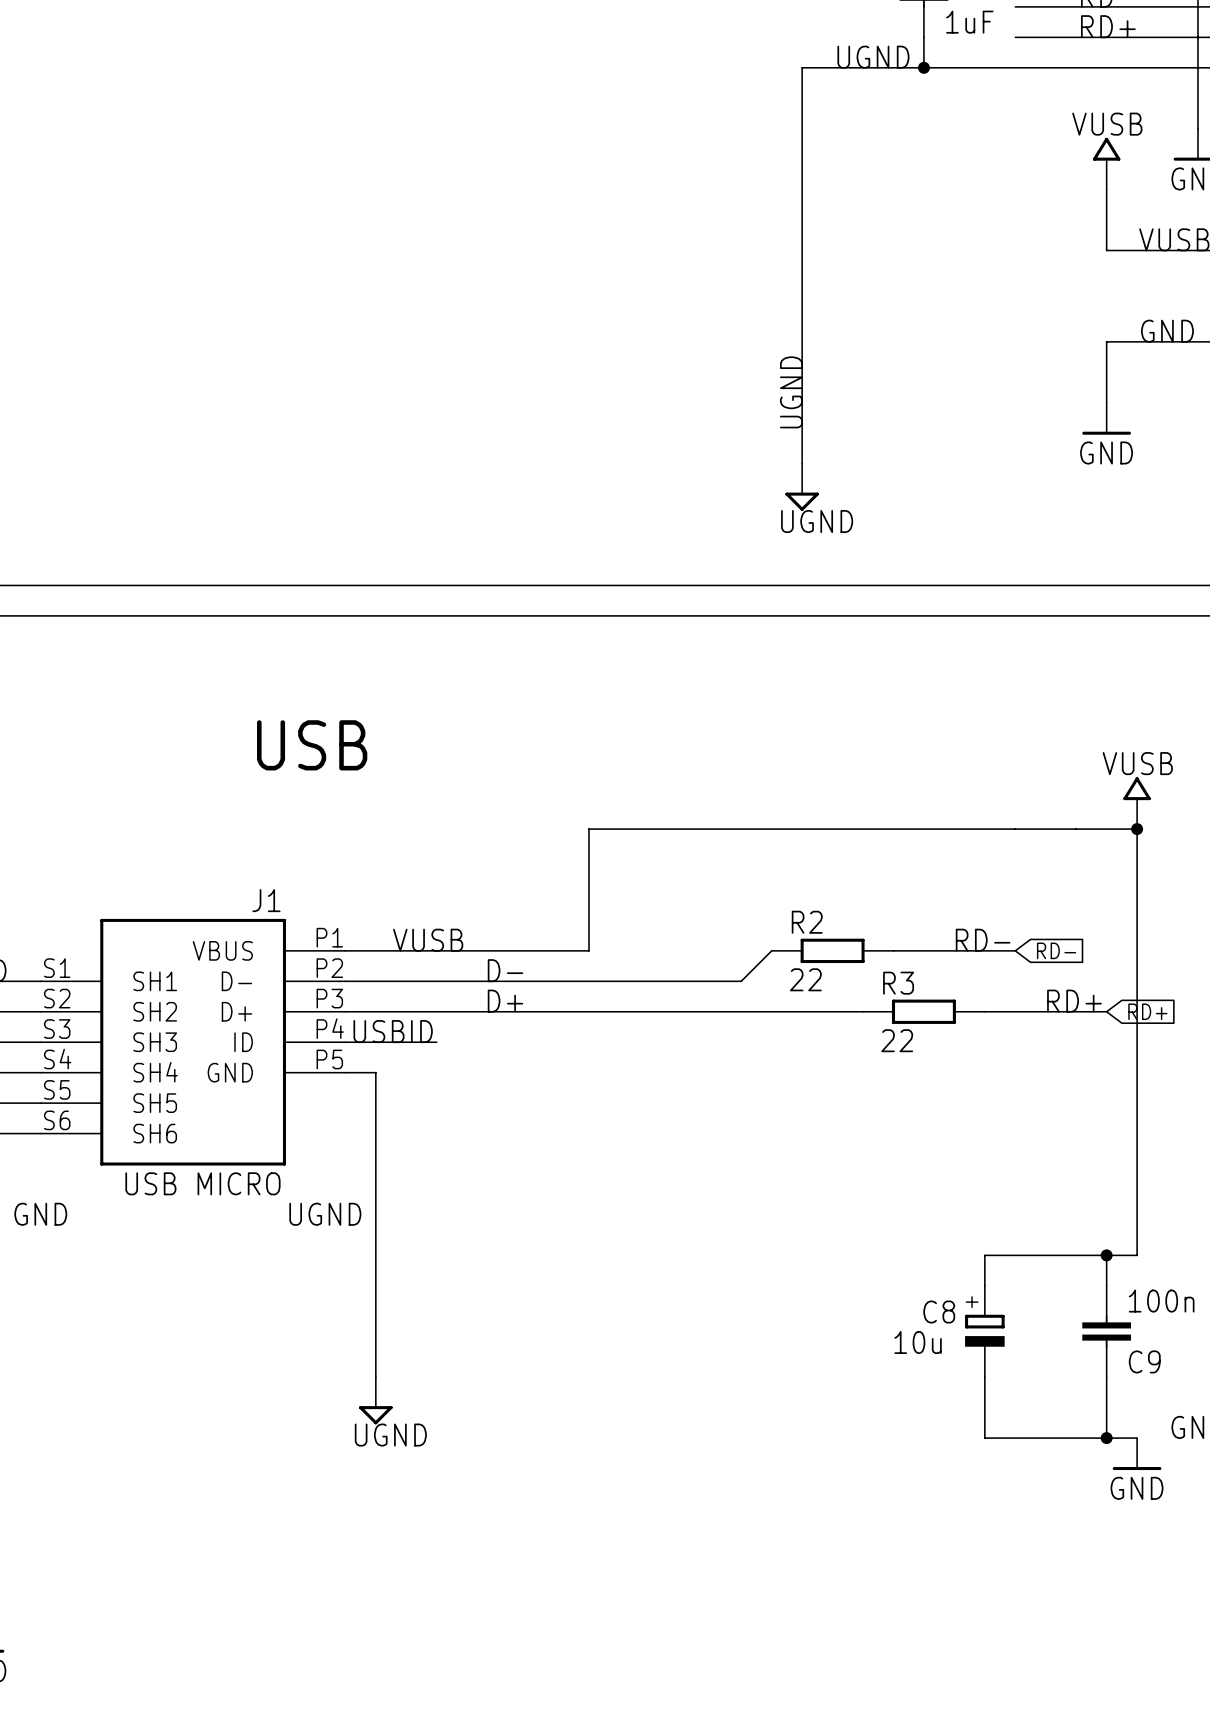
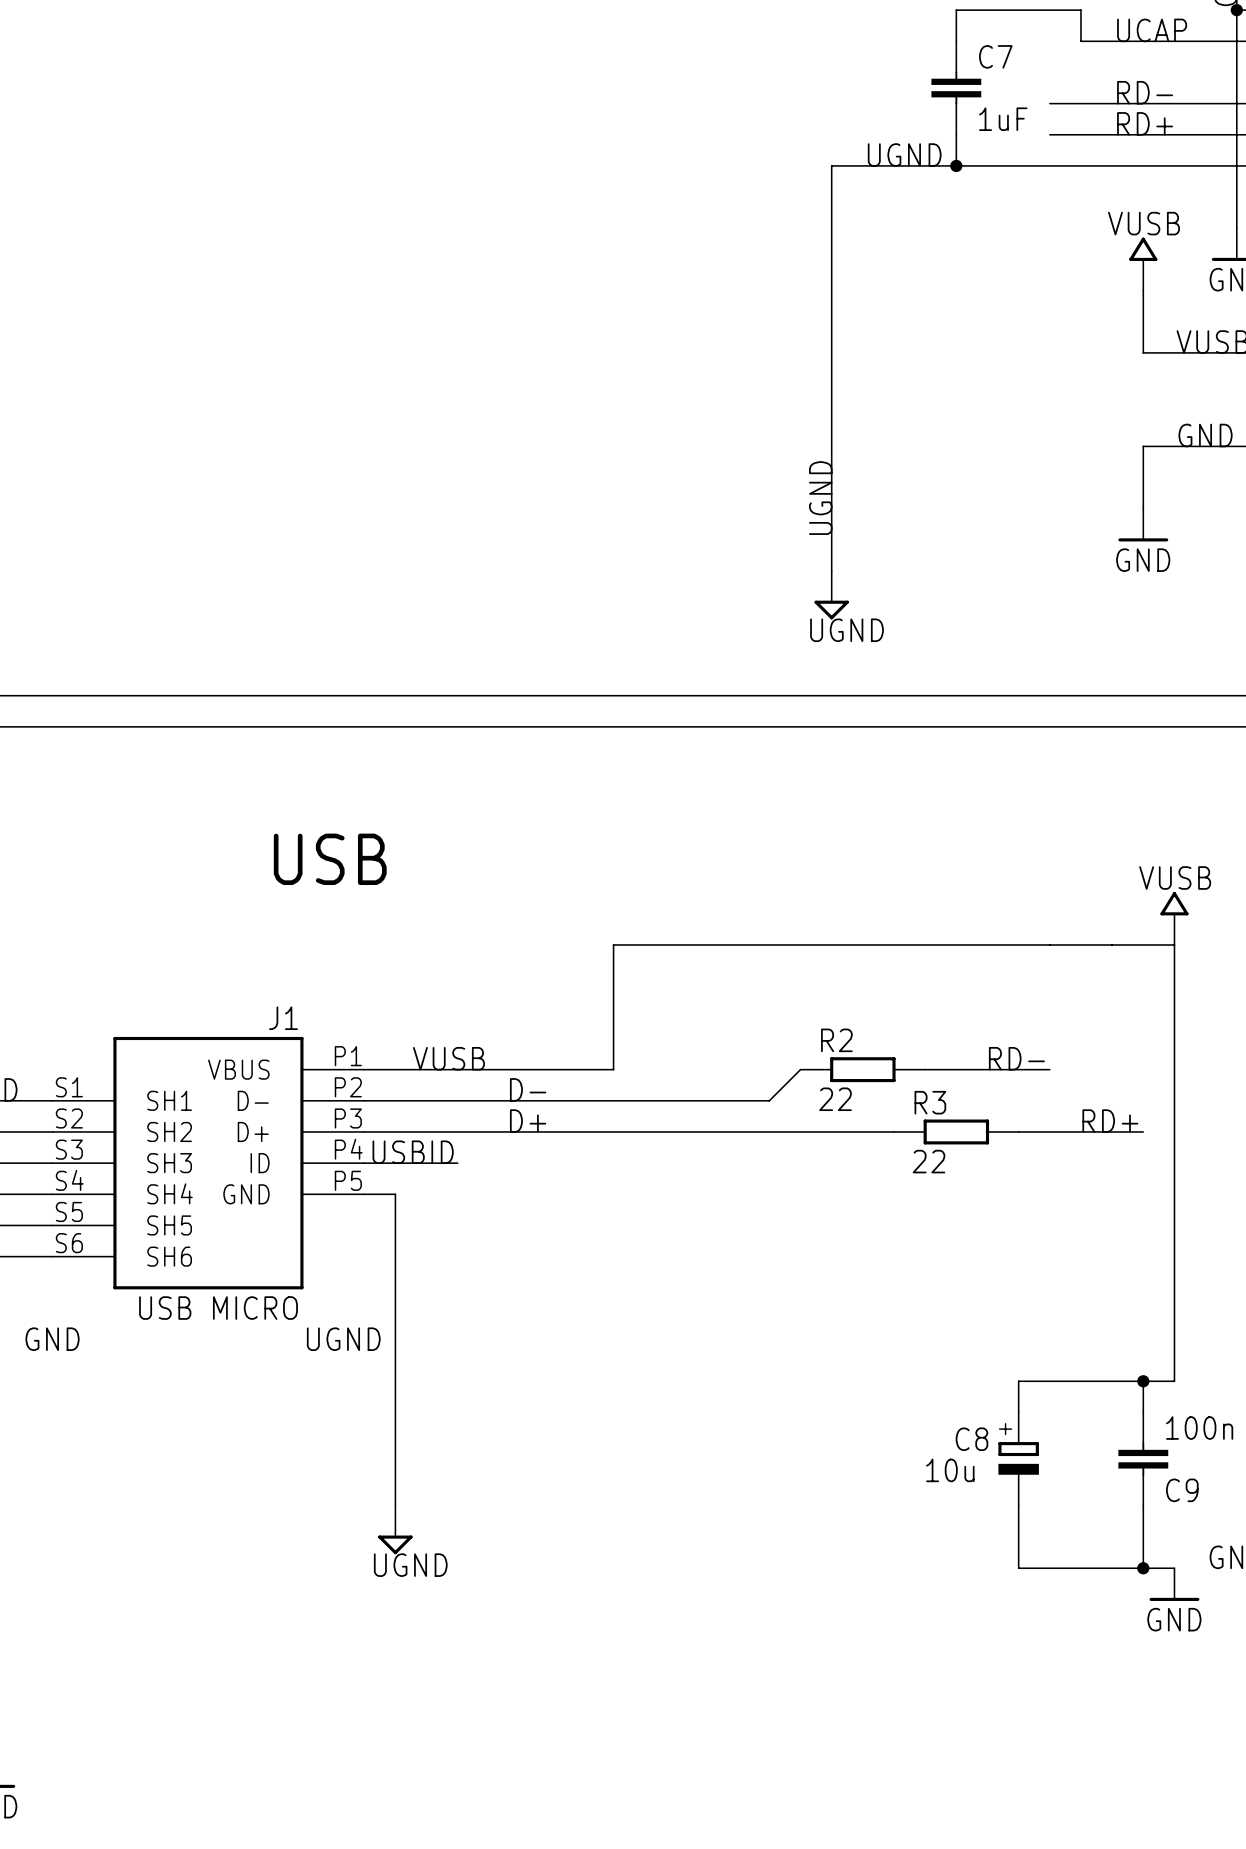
junction: (1137, 829) -> none
global label: RD- (1056, 950) -> none
global label: RD+ (1147, 1011) -> none

